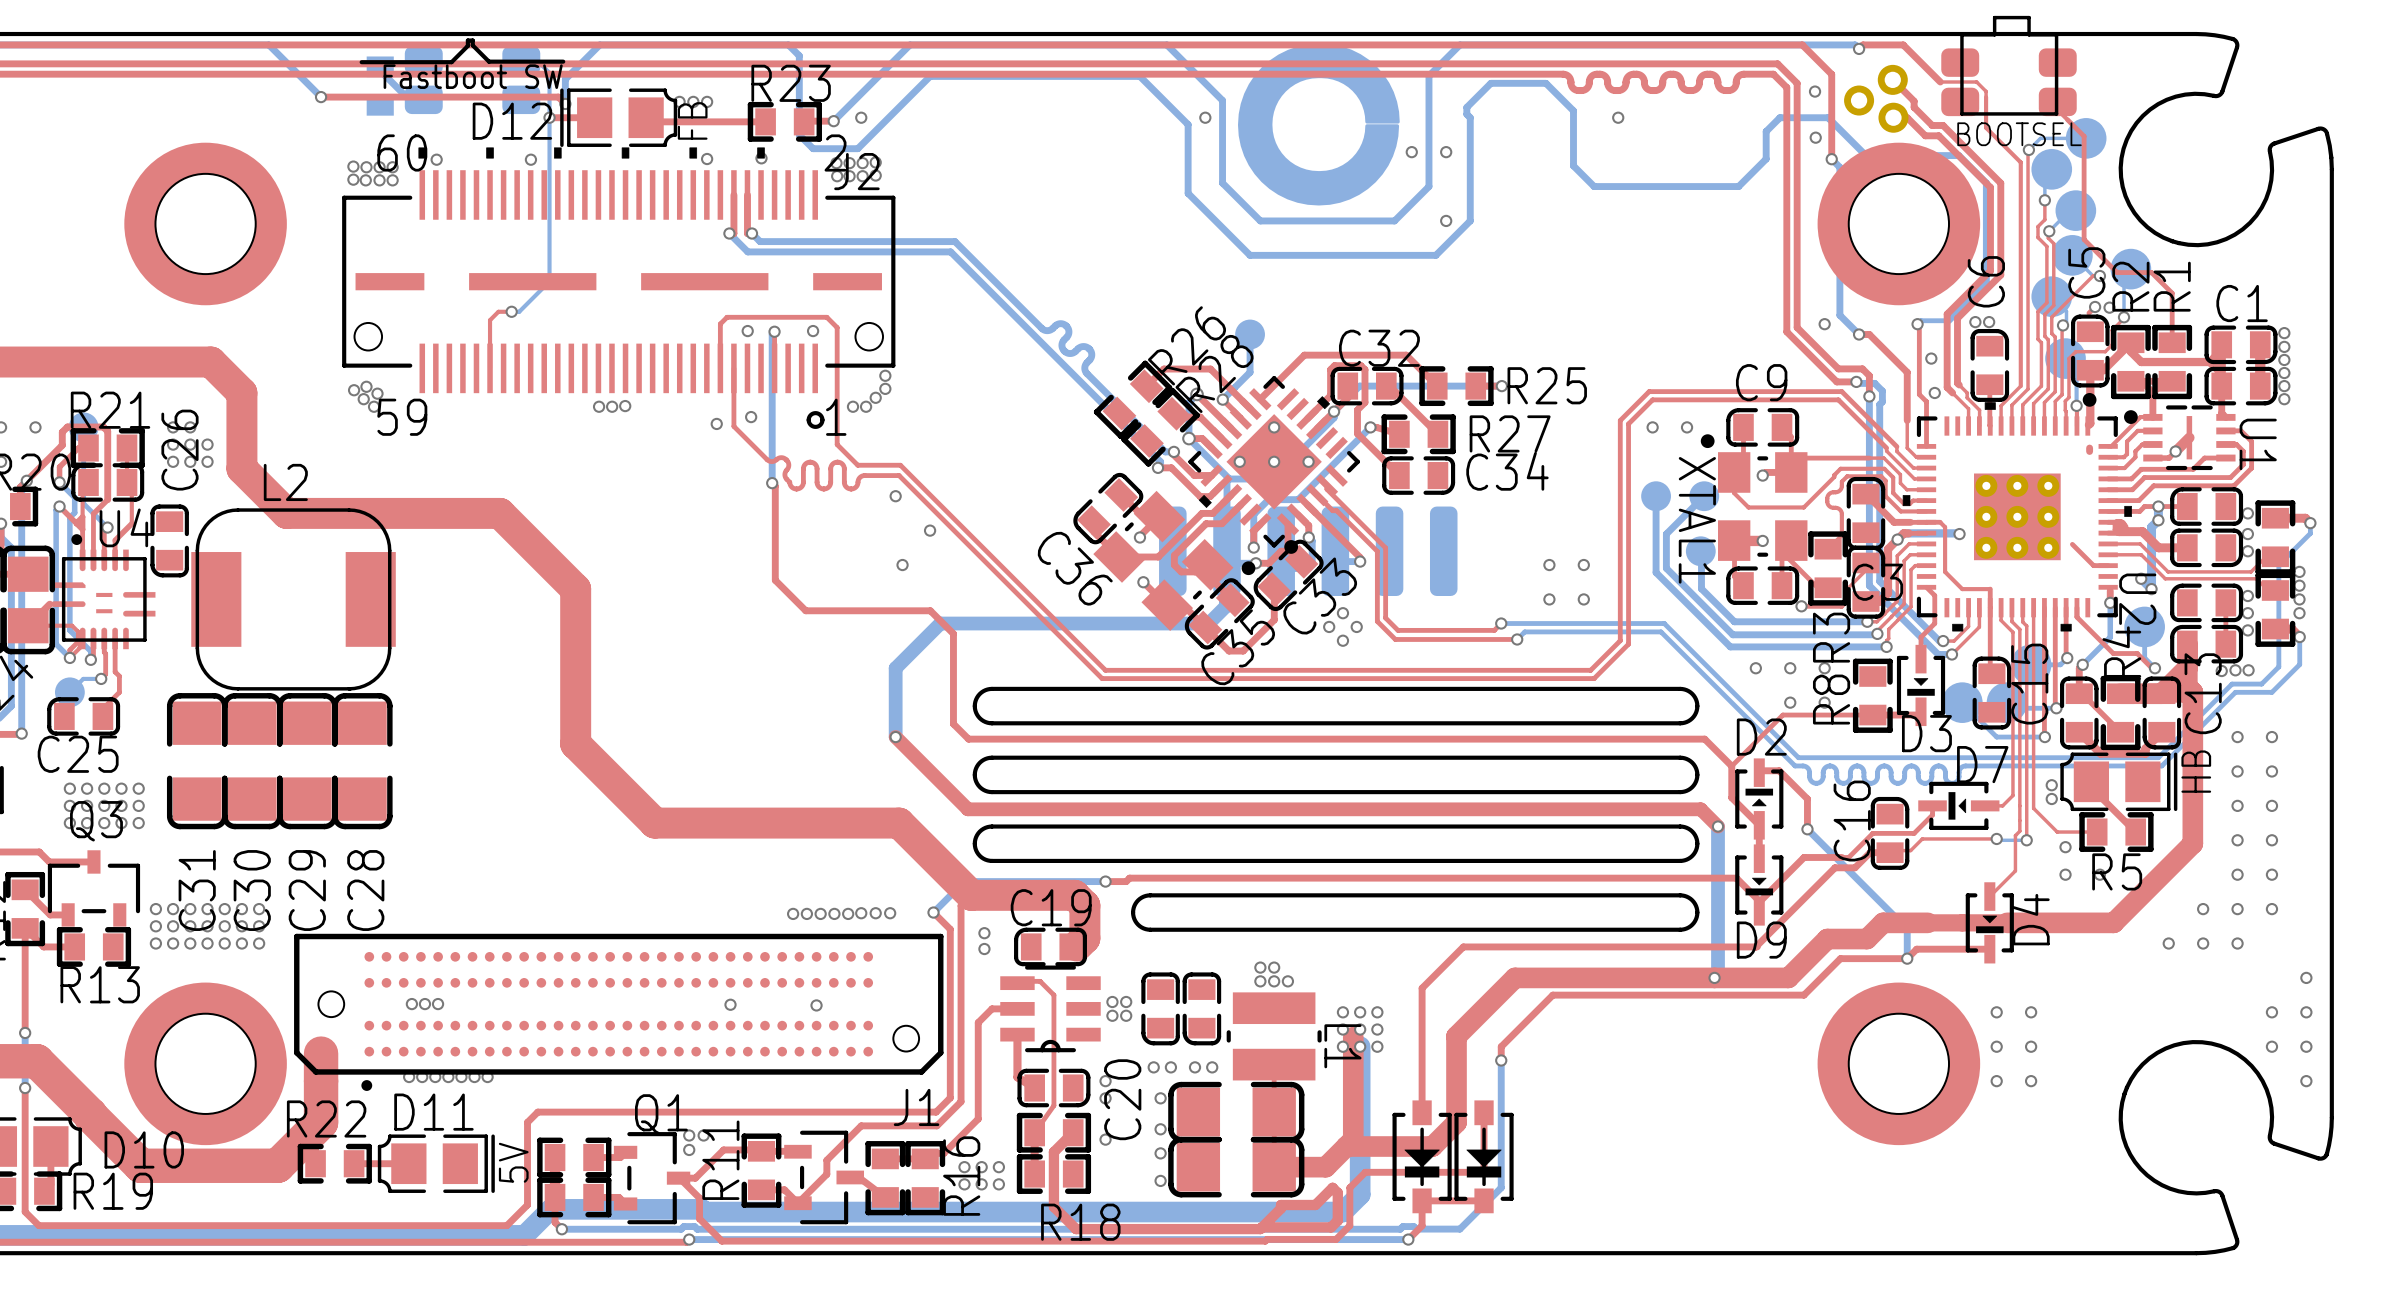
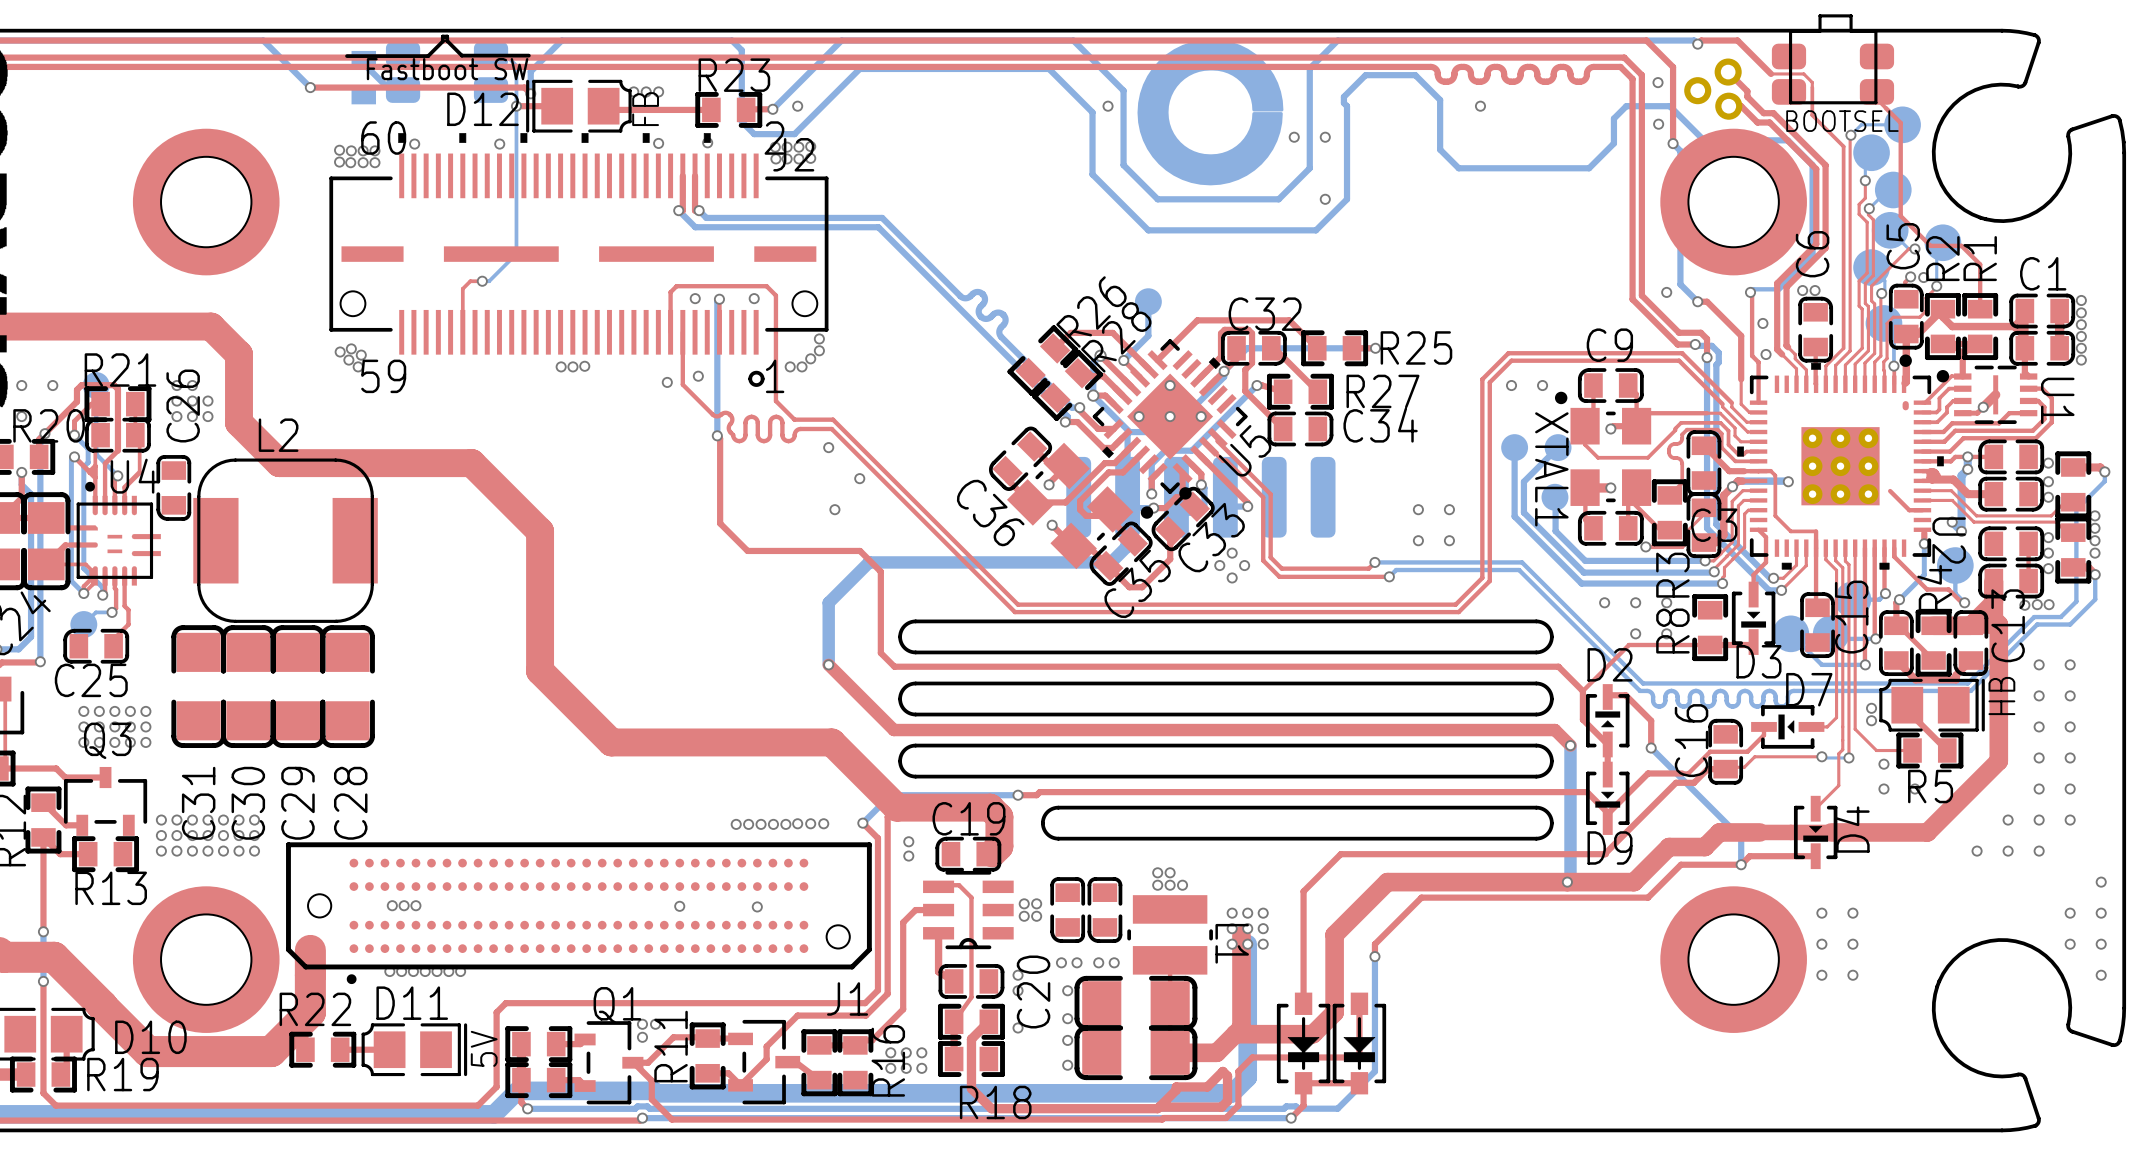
U5 name: none -> U5 (1245, 450)

